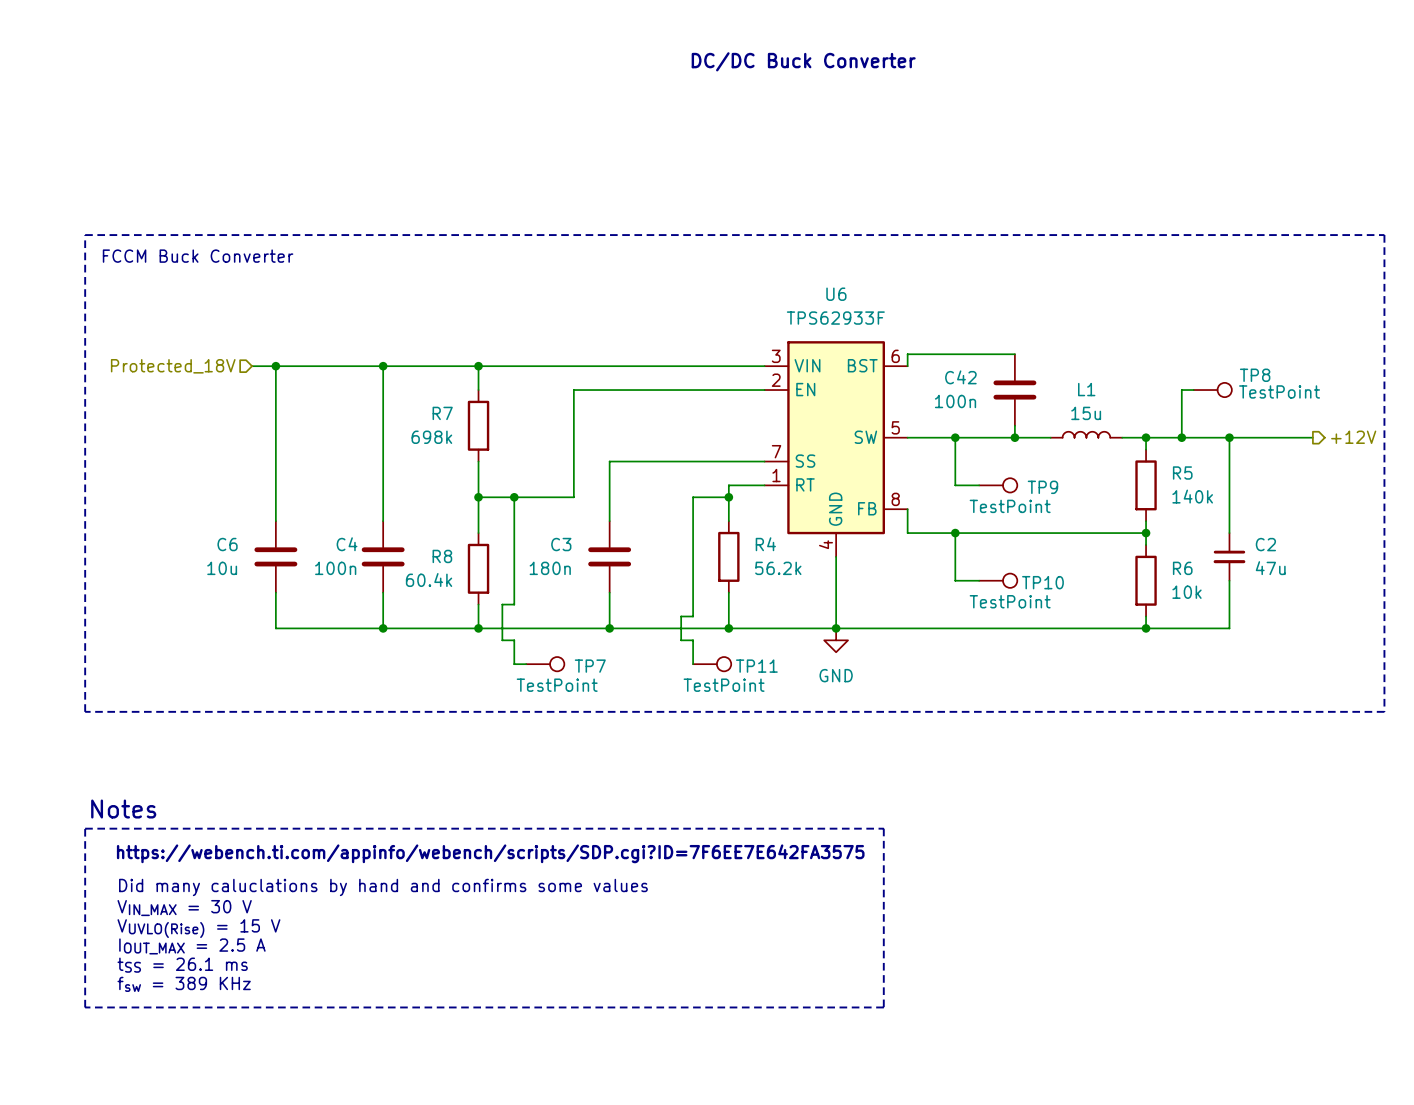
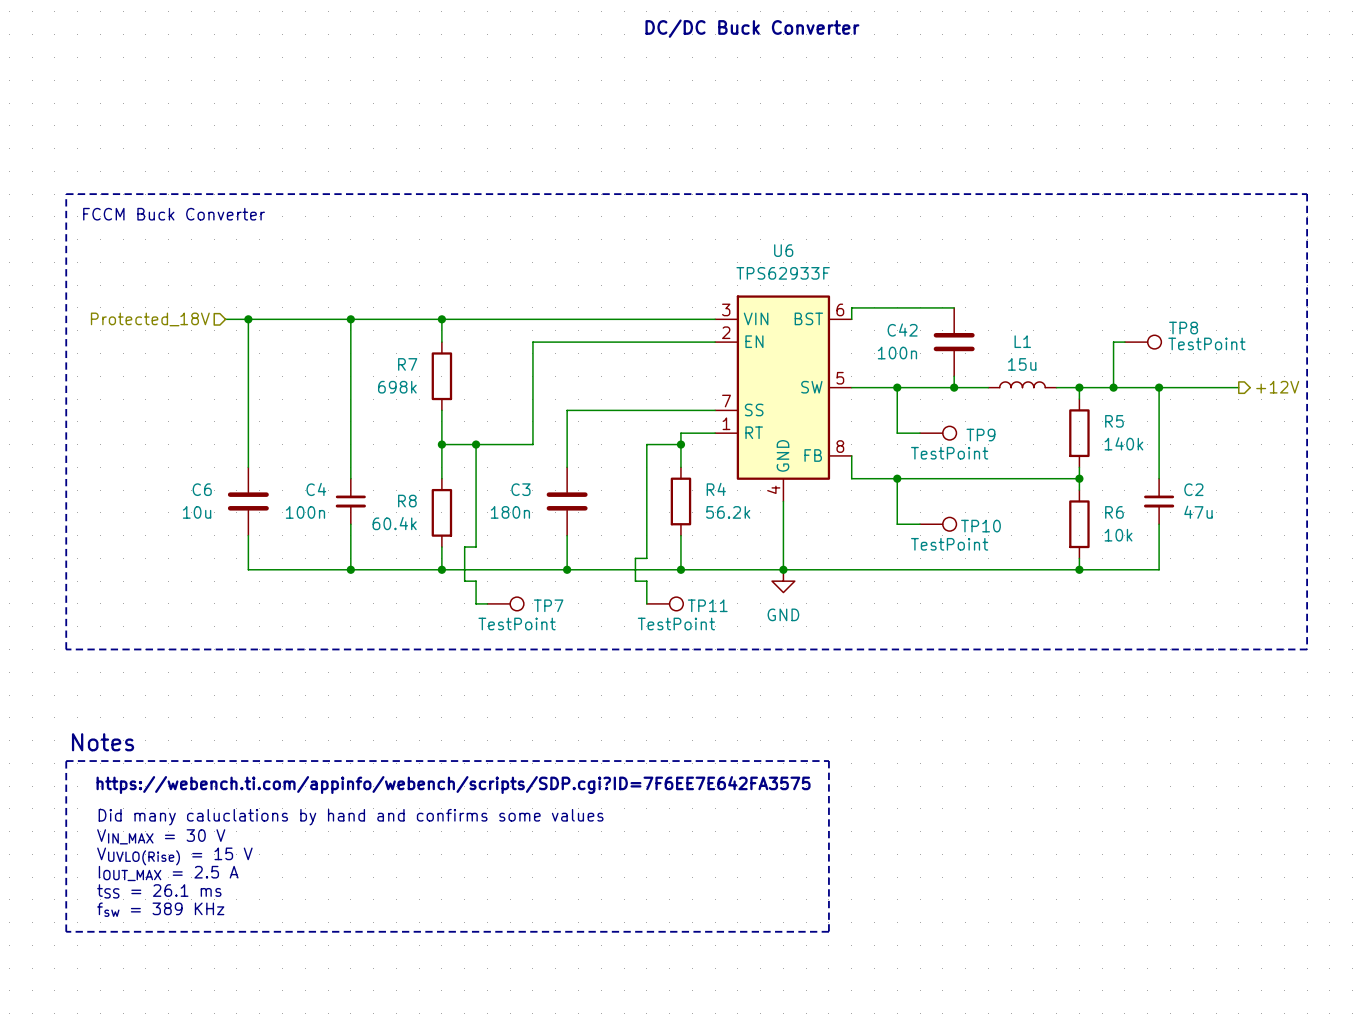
C4 symbol: [361, 521, 405, 593] -> [335, 478, 366, 525]

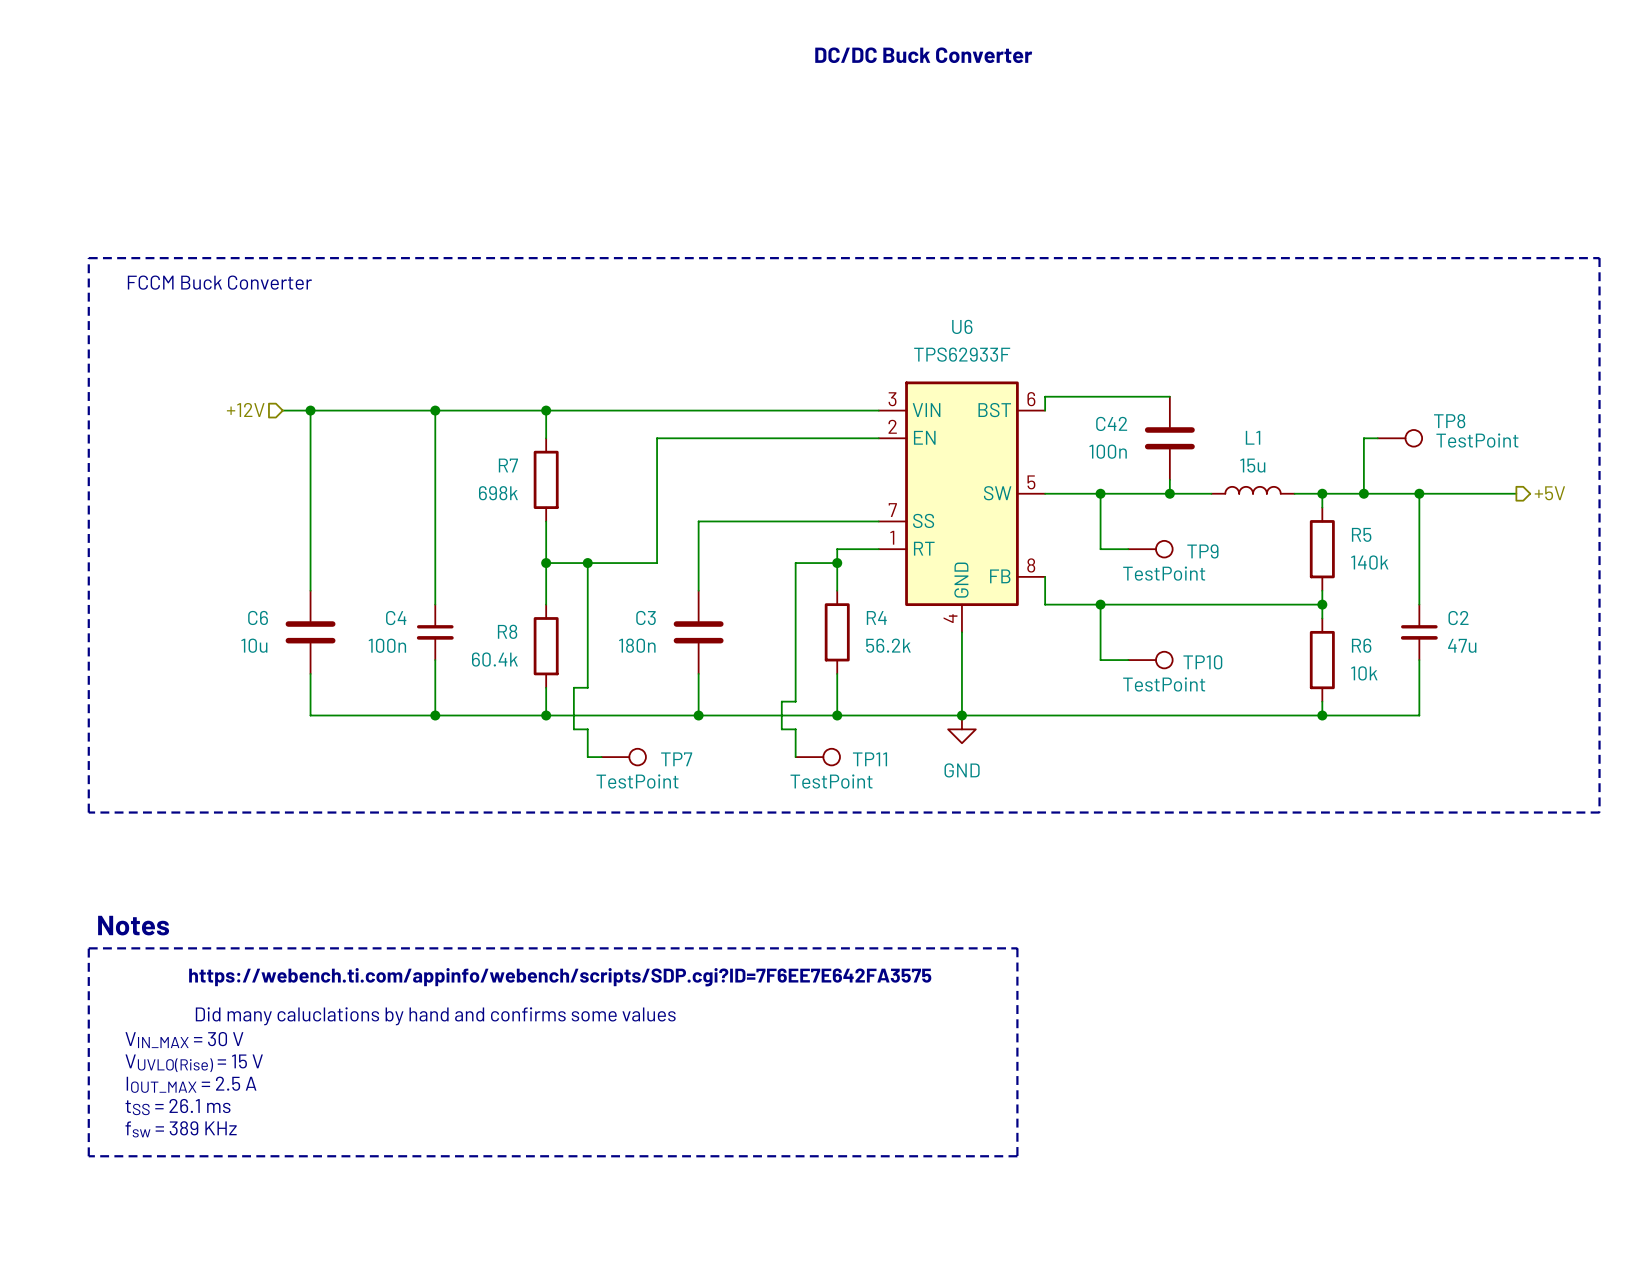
hierarchical label: Protected_18V (150, 319) -> +12V (245, 409)
hierarchical label: +12V (1277, 387) -> +5V (1549, 493)

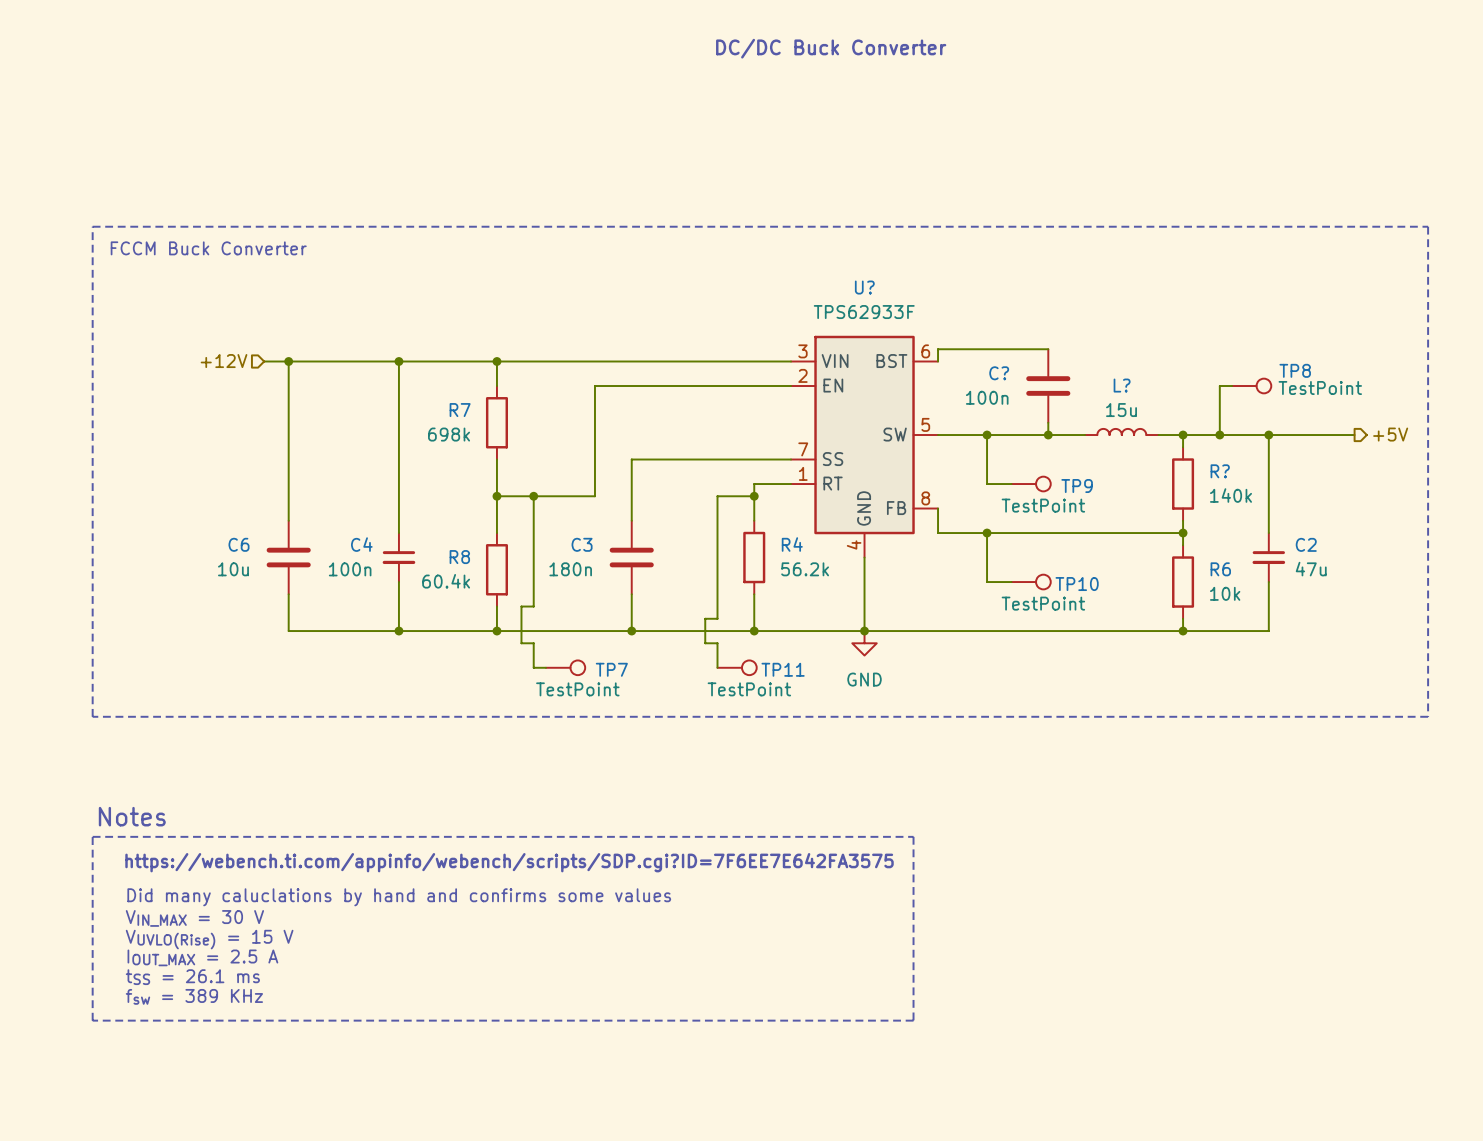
U6 name: U6 (962, 326) -> U? (864, 287)
C42 name: C42 (1111, 423) -> C? (999, 373)
L1 name: L1 (1253, 437) -> L? (1122, 385)
R5 name: R5 (1361, 534) -> R? (1220, 471)

